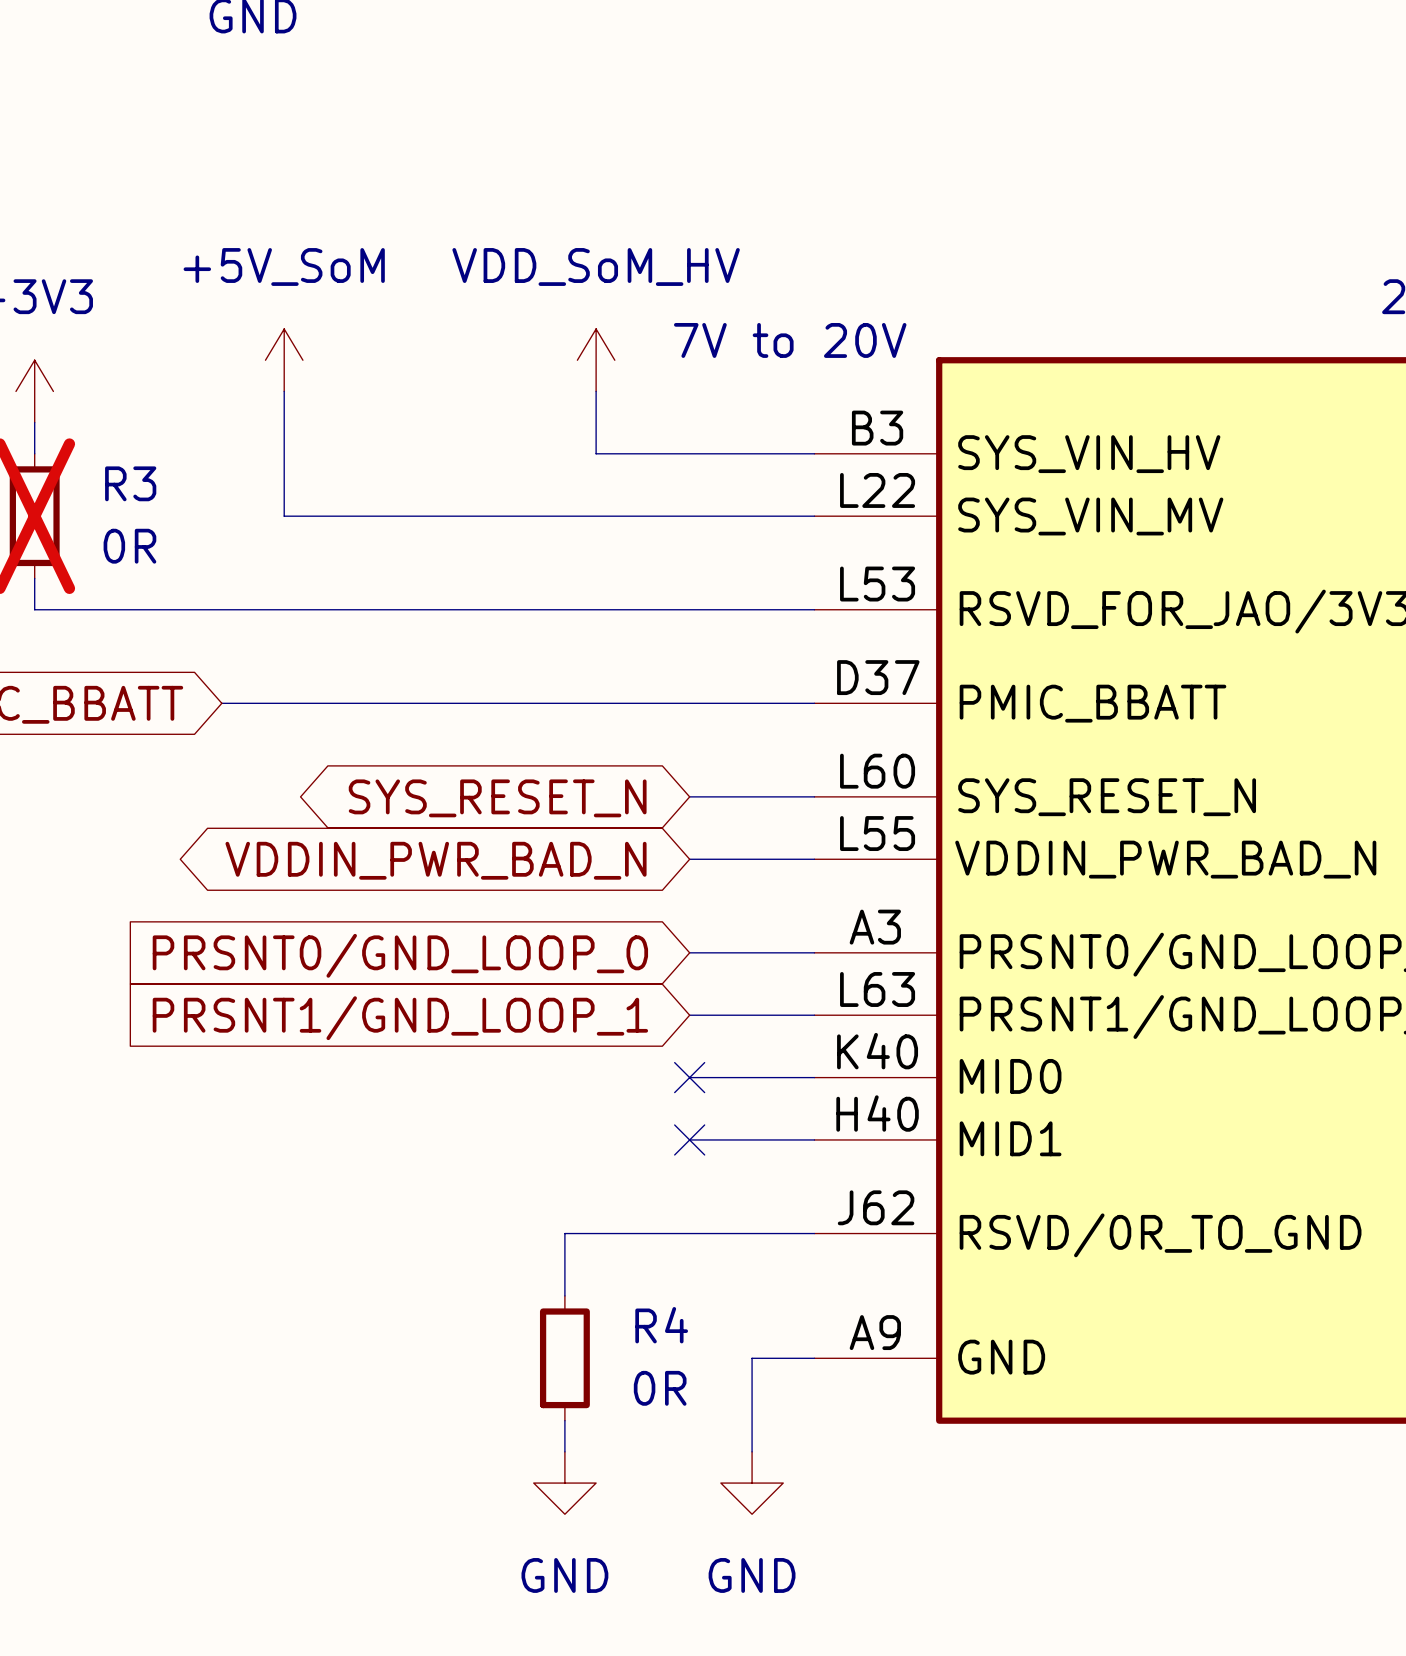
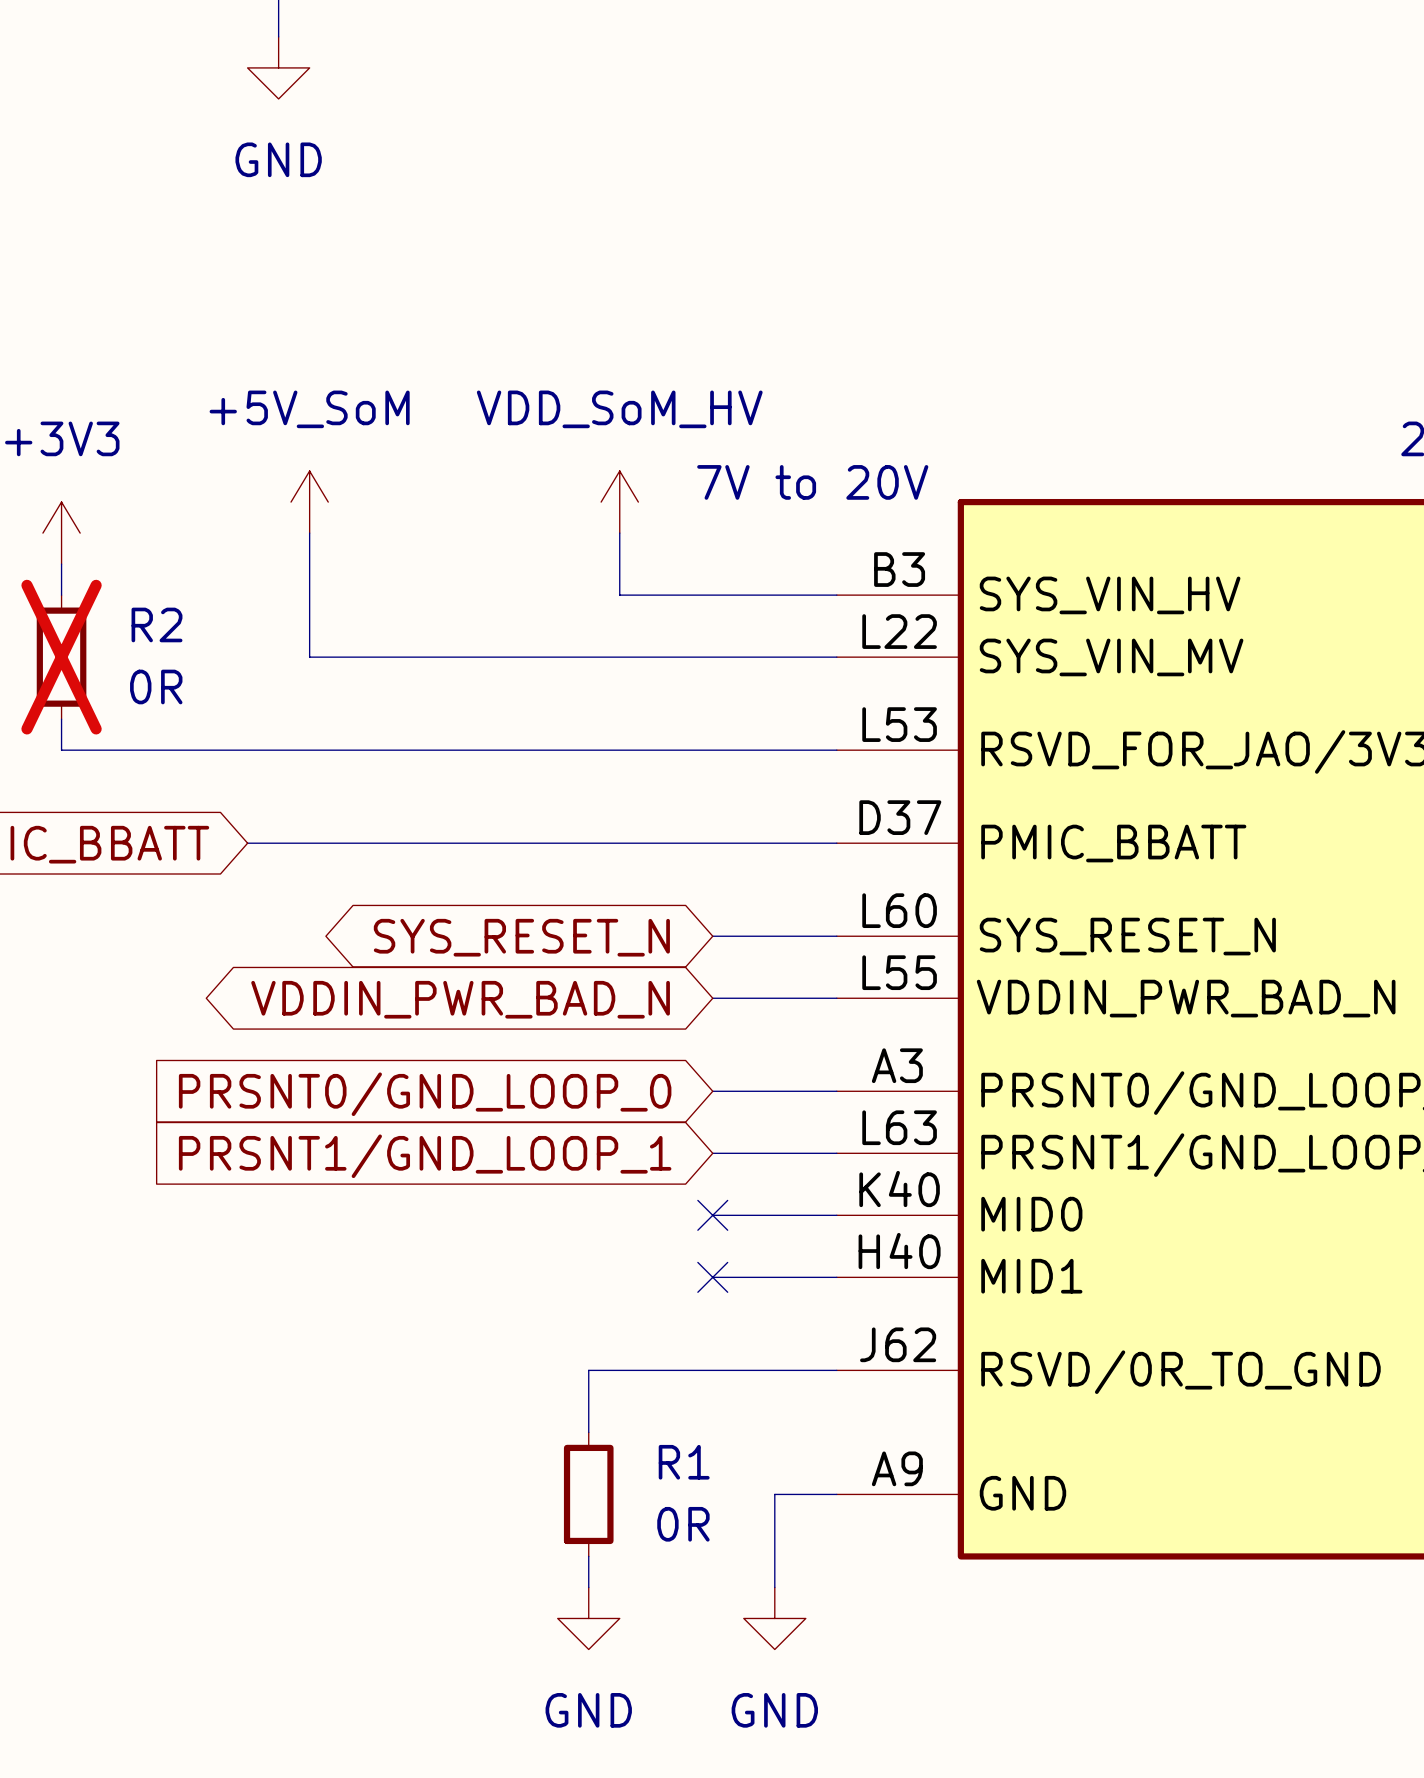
R3 name: R3 (130, 483) -> R2 (156, 624)
R4 name: R4 (661, 1325) -> R1 (684, 1462)

